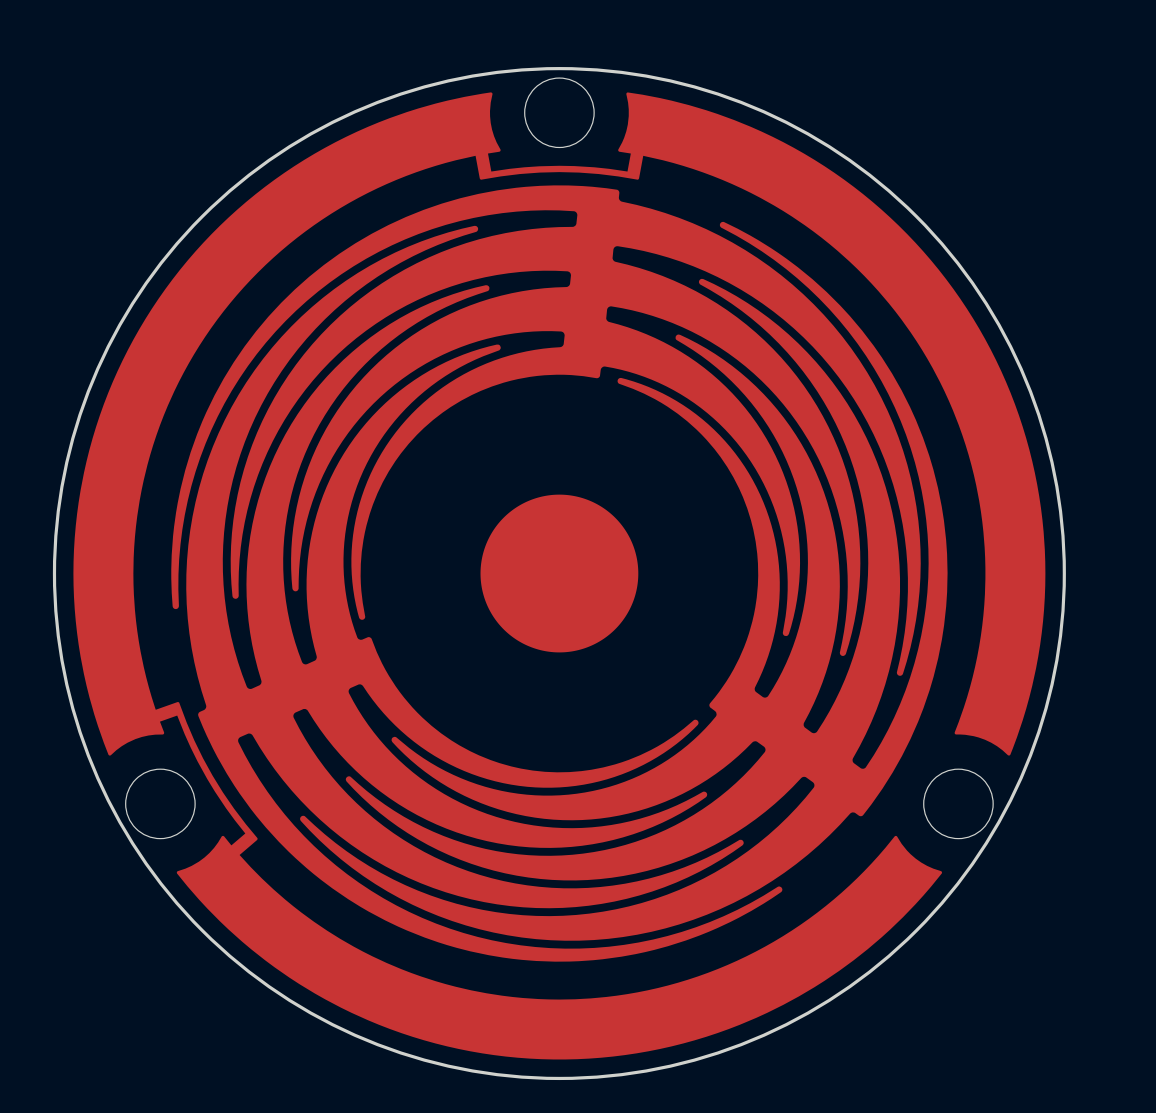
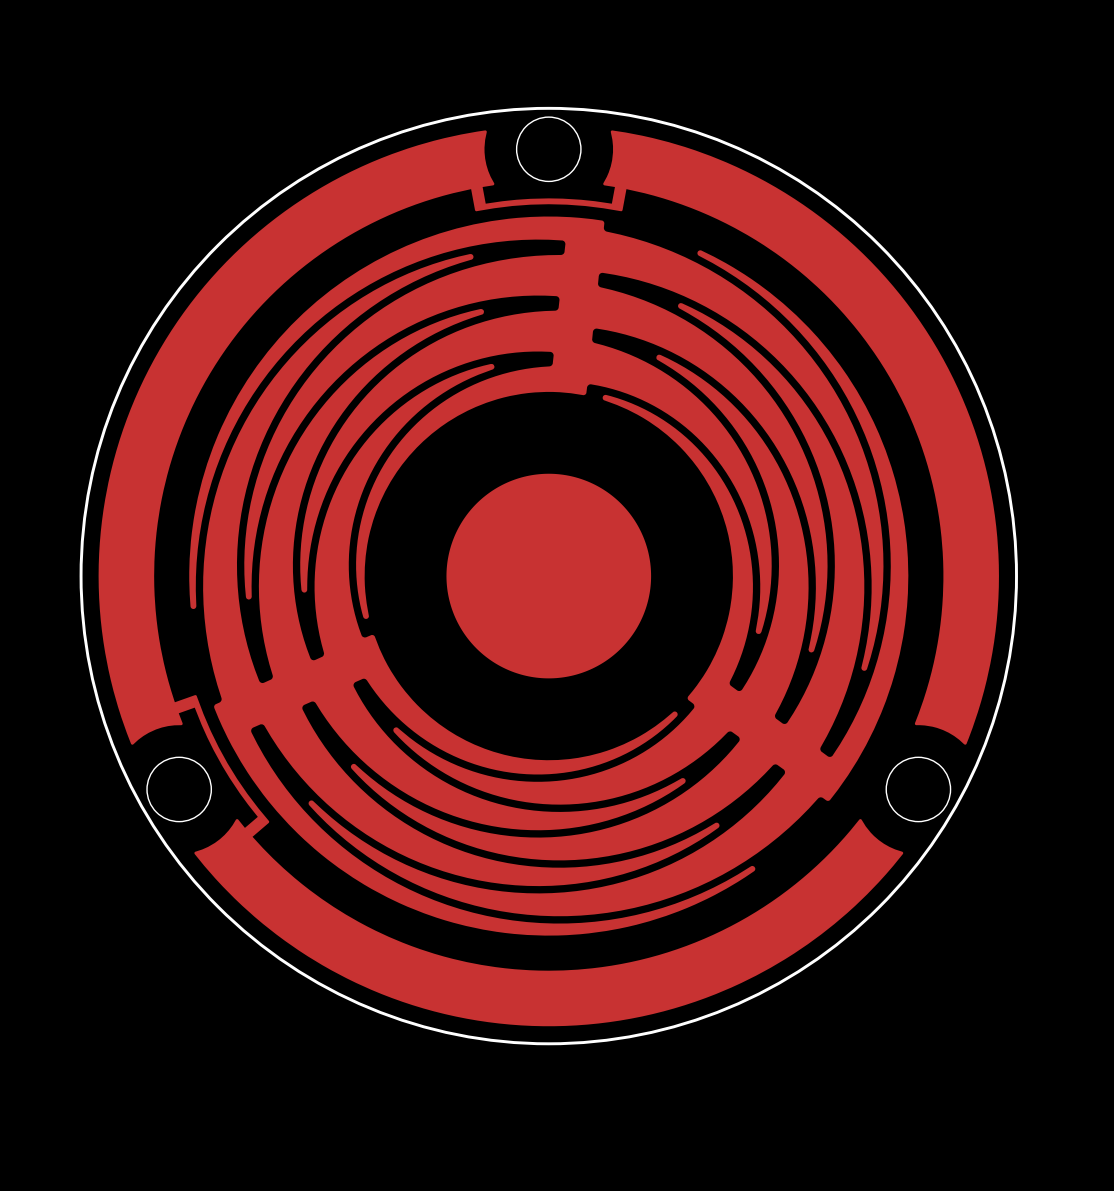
part footprint: [480, 494, 639, 653] -> [446, 473, 652, 679]

